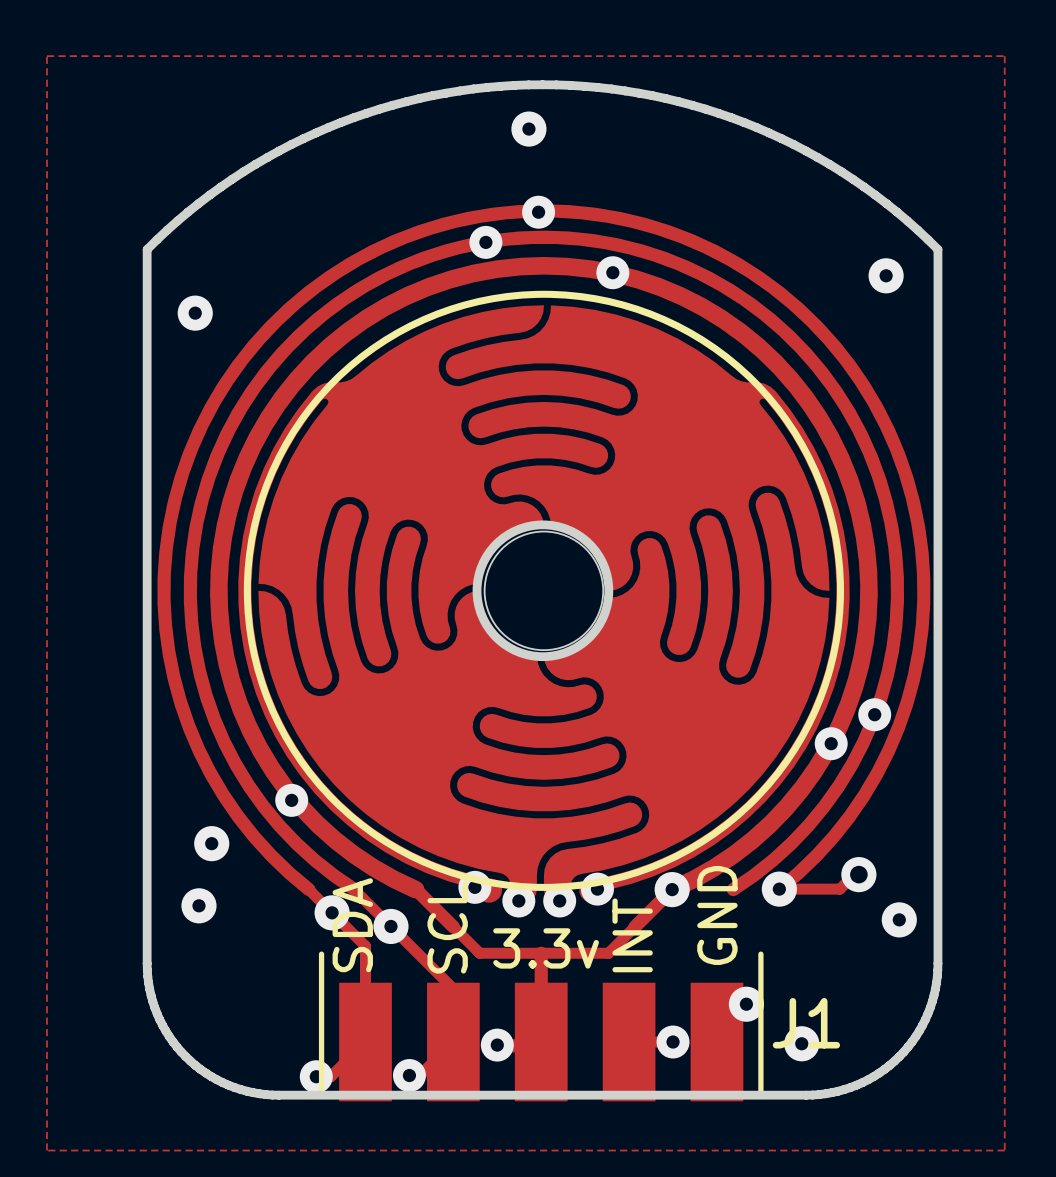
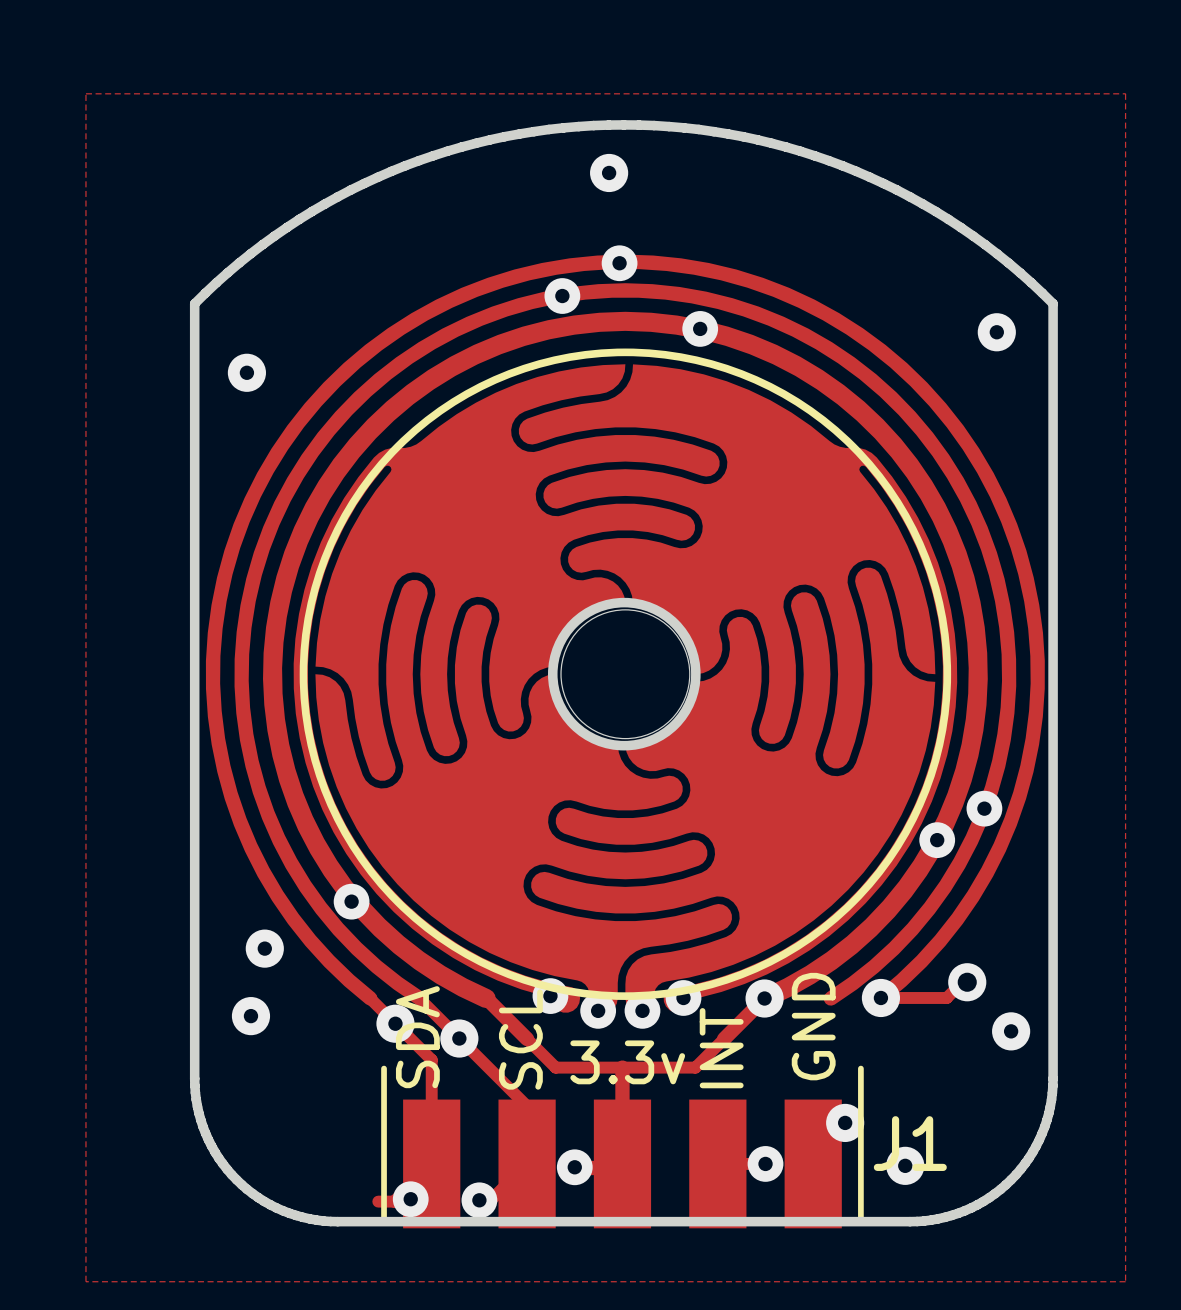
via position: (316, 1076) -> (410, 1199)

